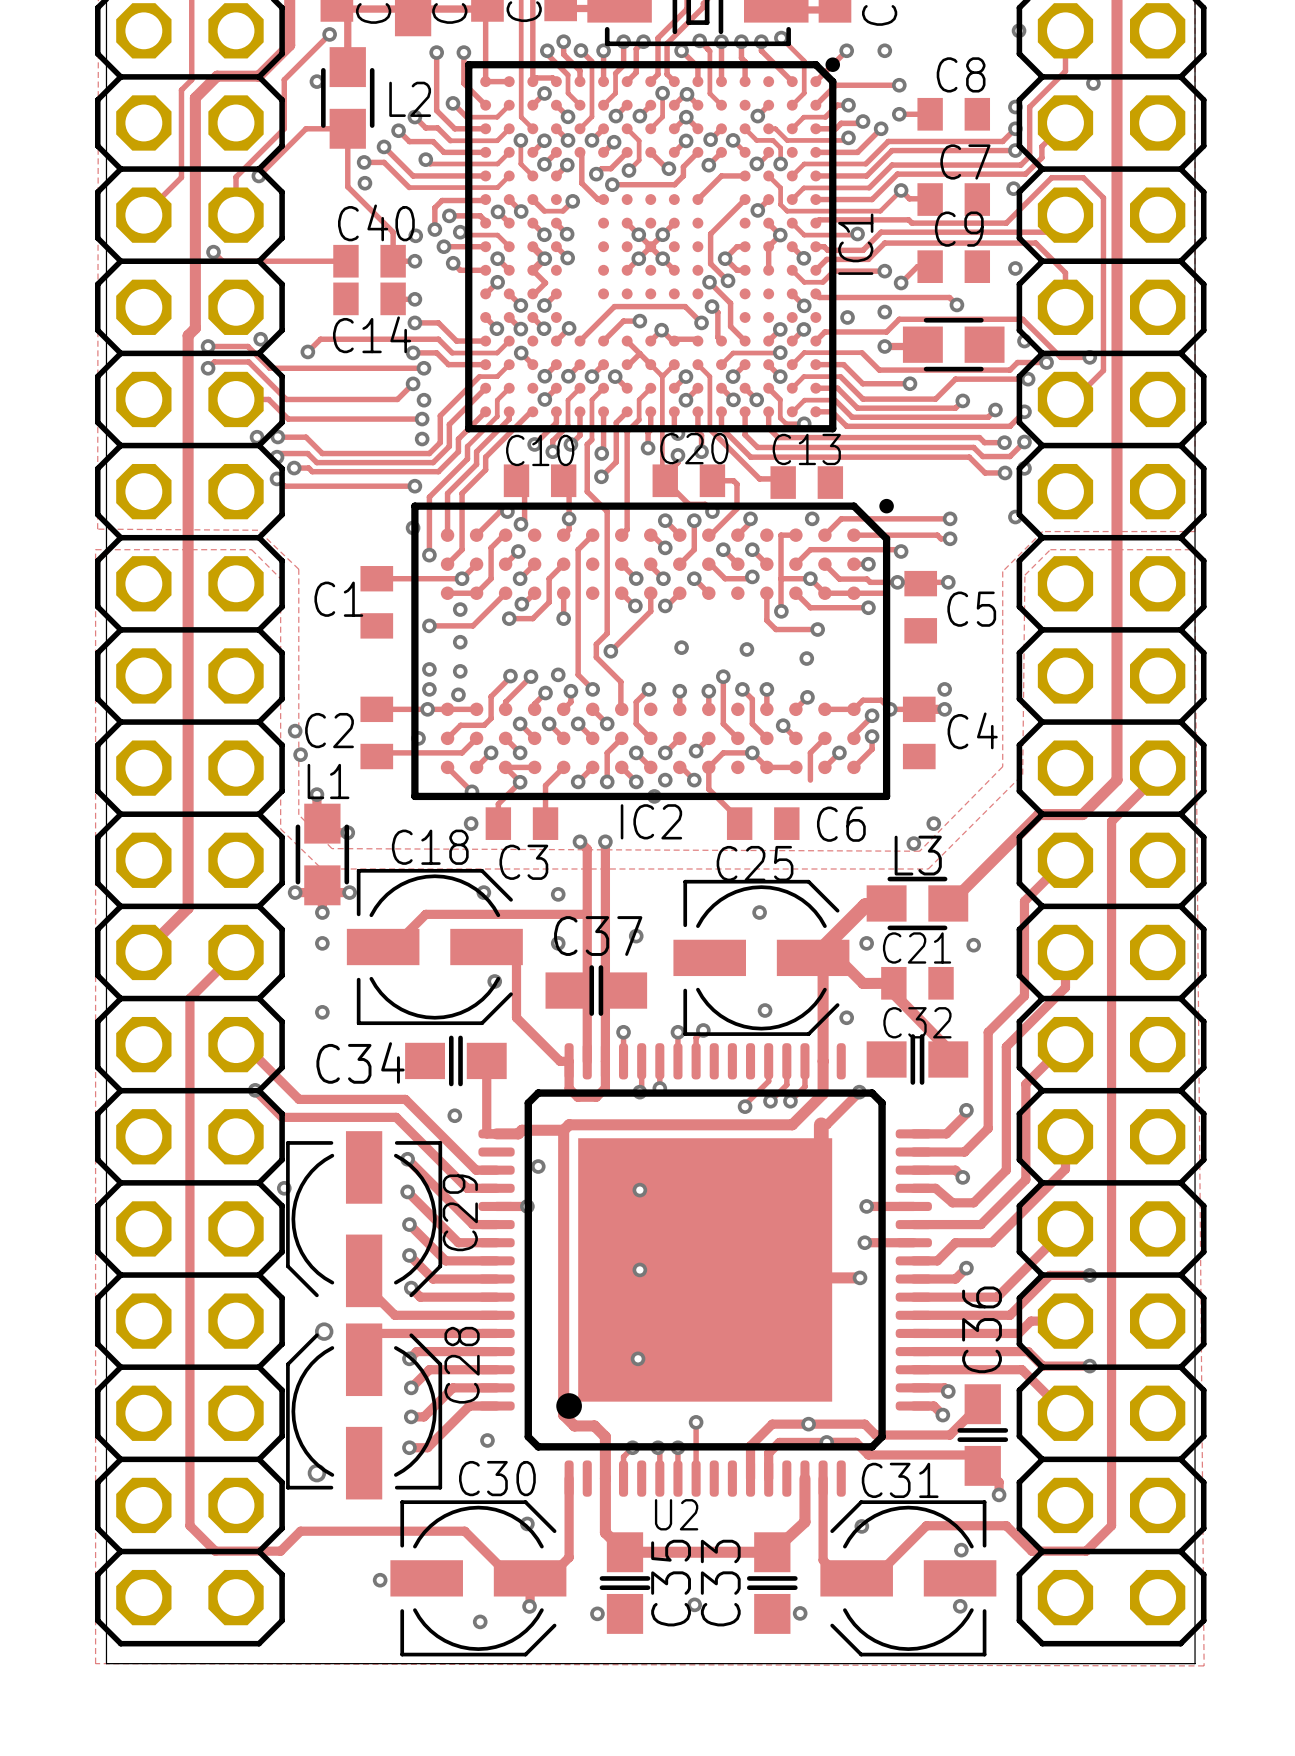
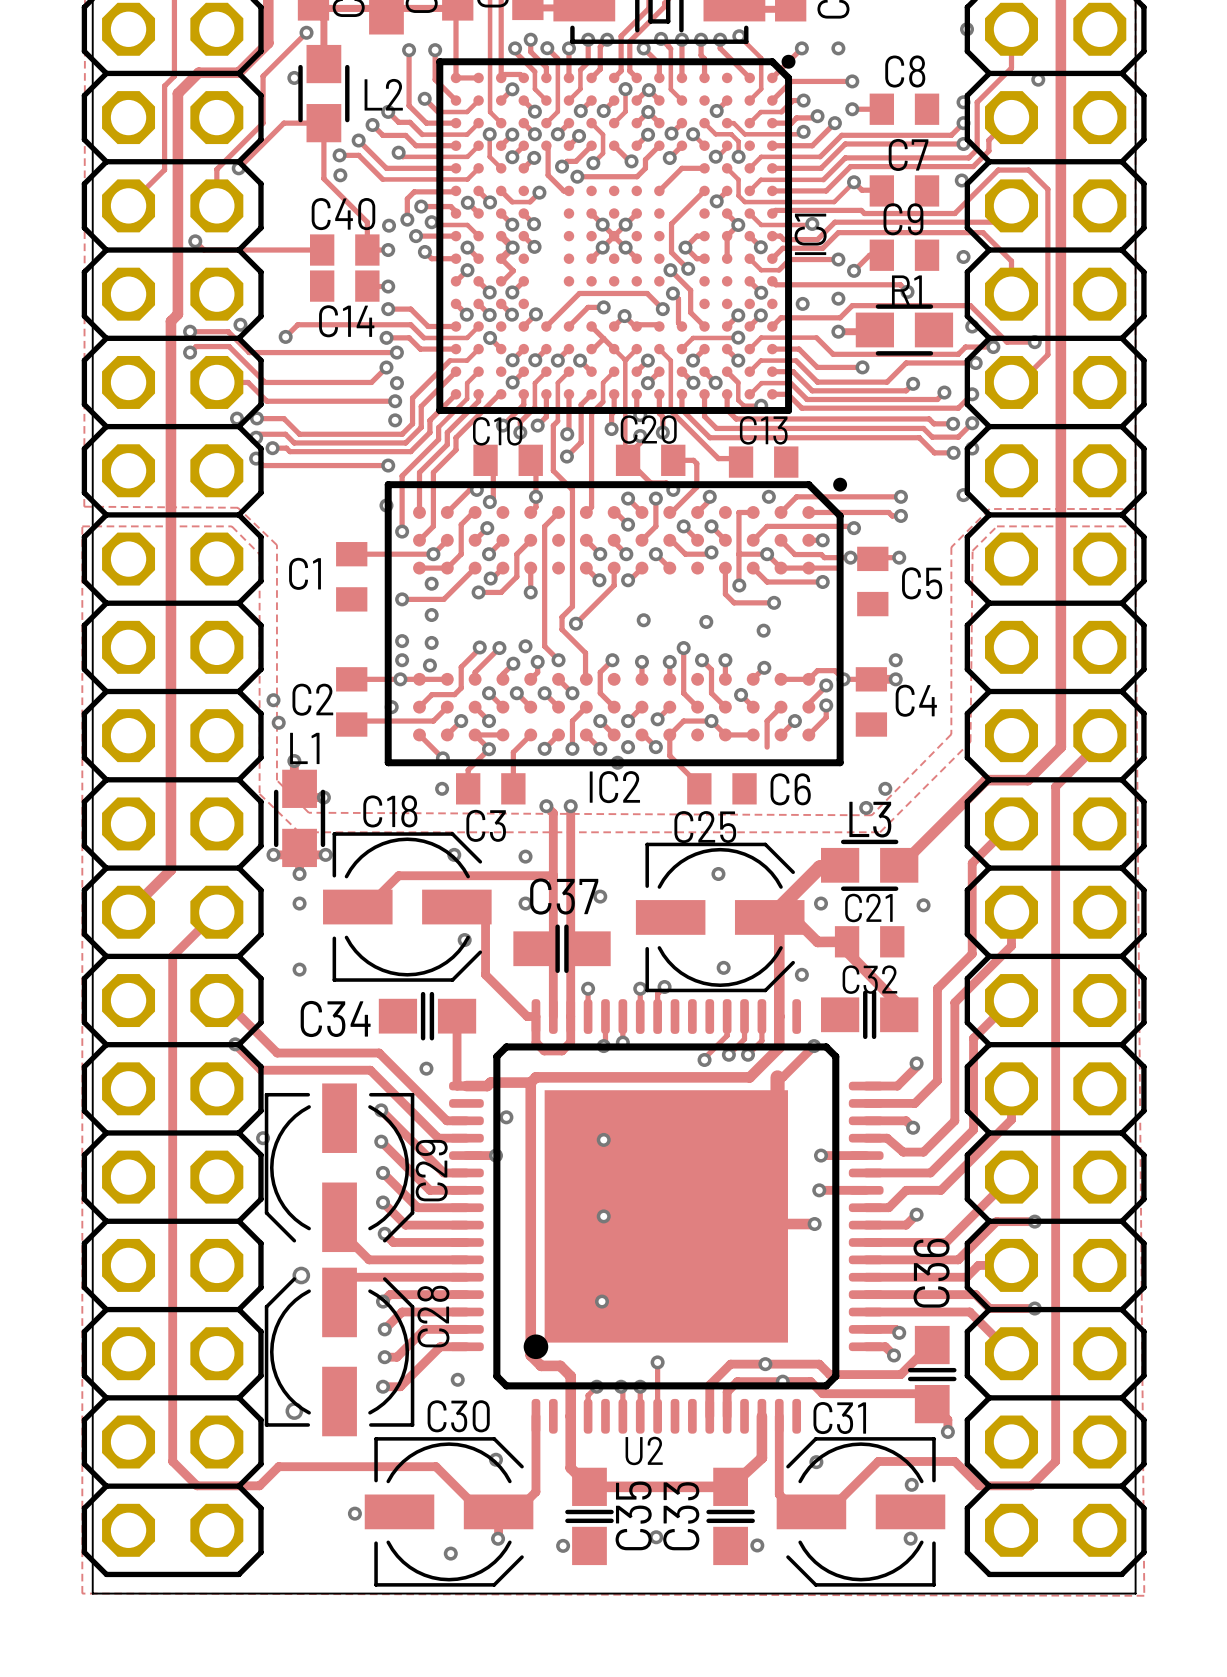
R1 name: none -> R1 (906, 290)

